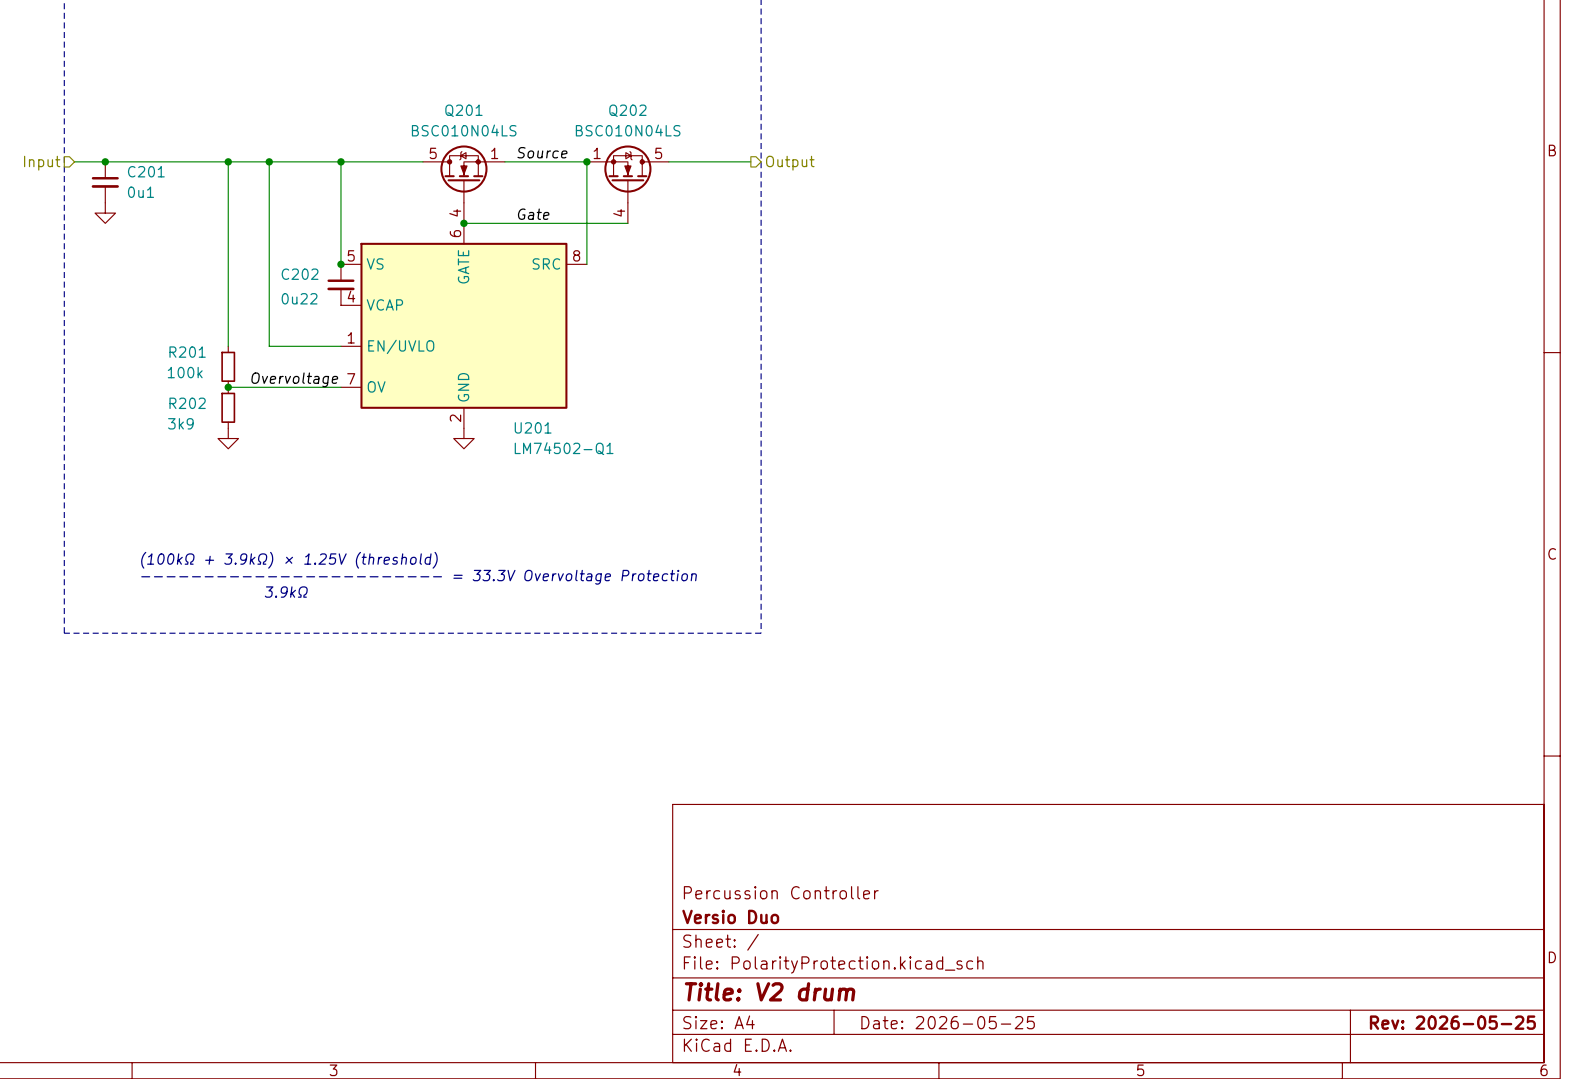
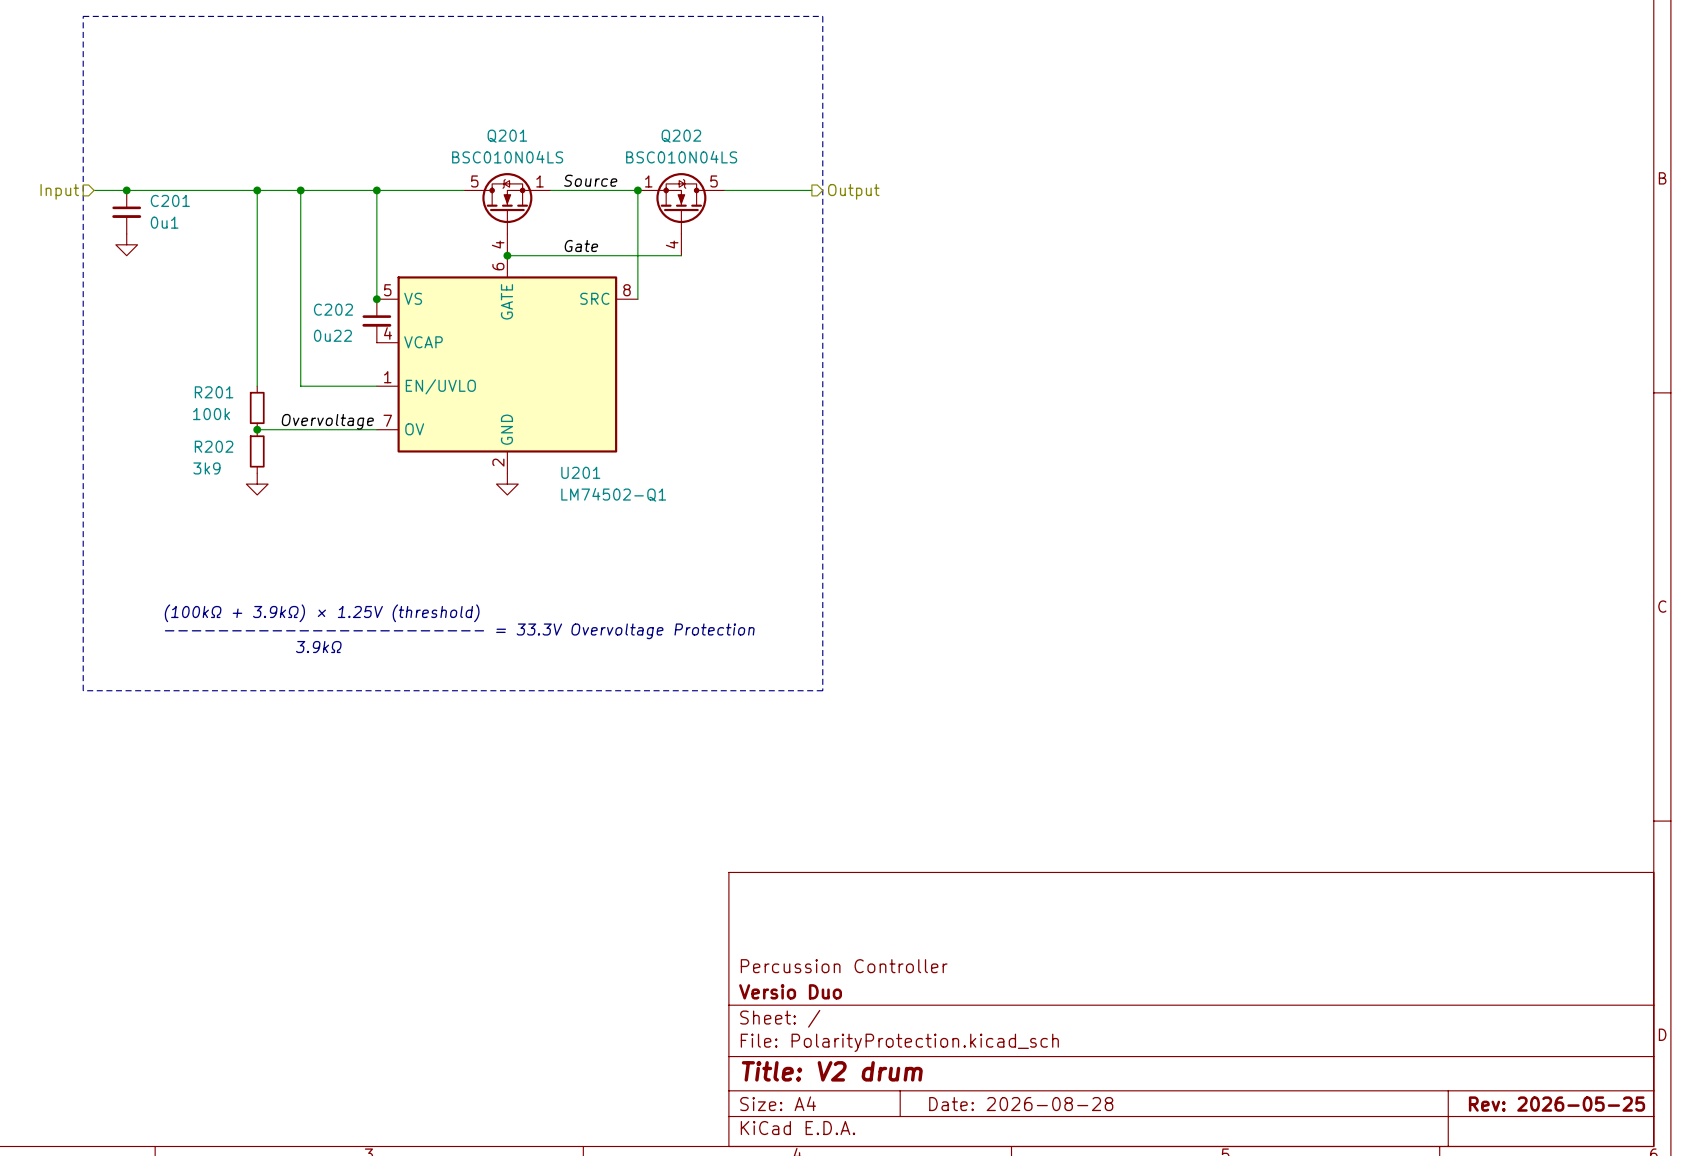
title block: Date: 2026-05-25 (948, 1022) -> Date: 2026-08-28 (1021, 1104)

